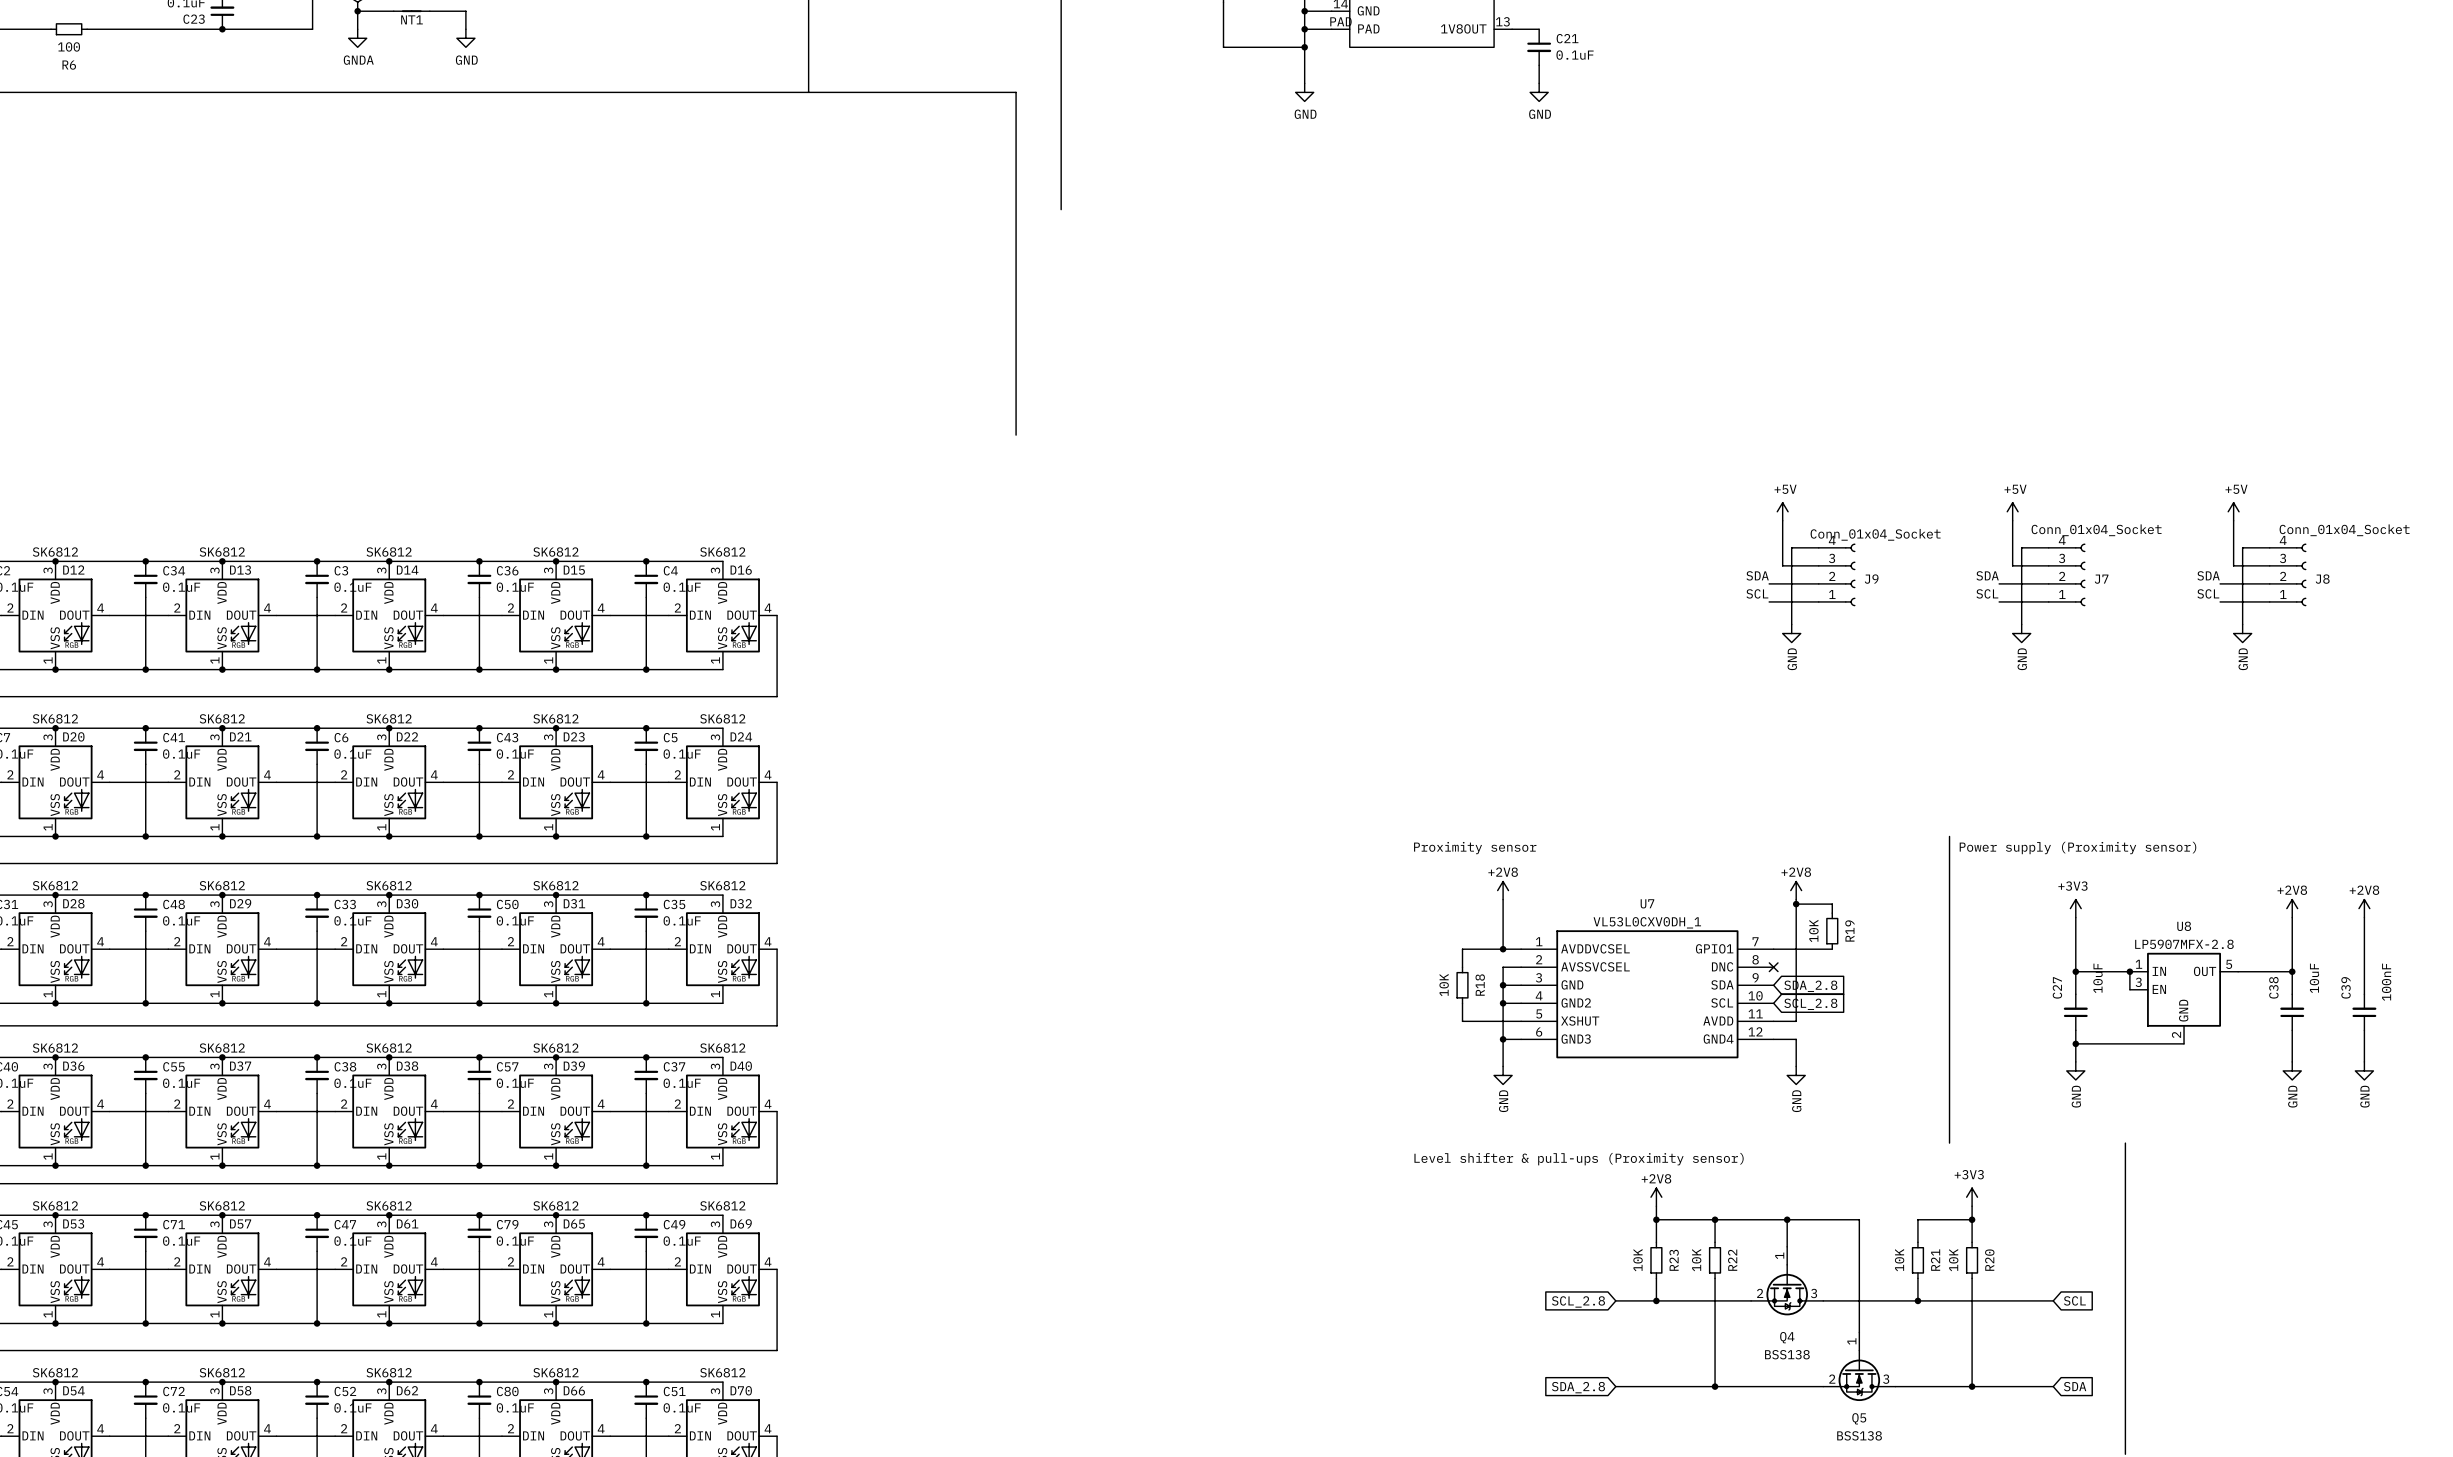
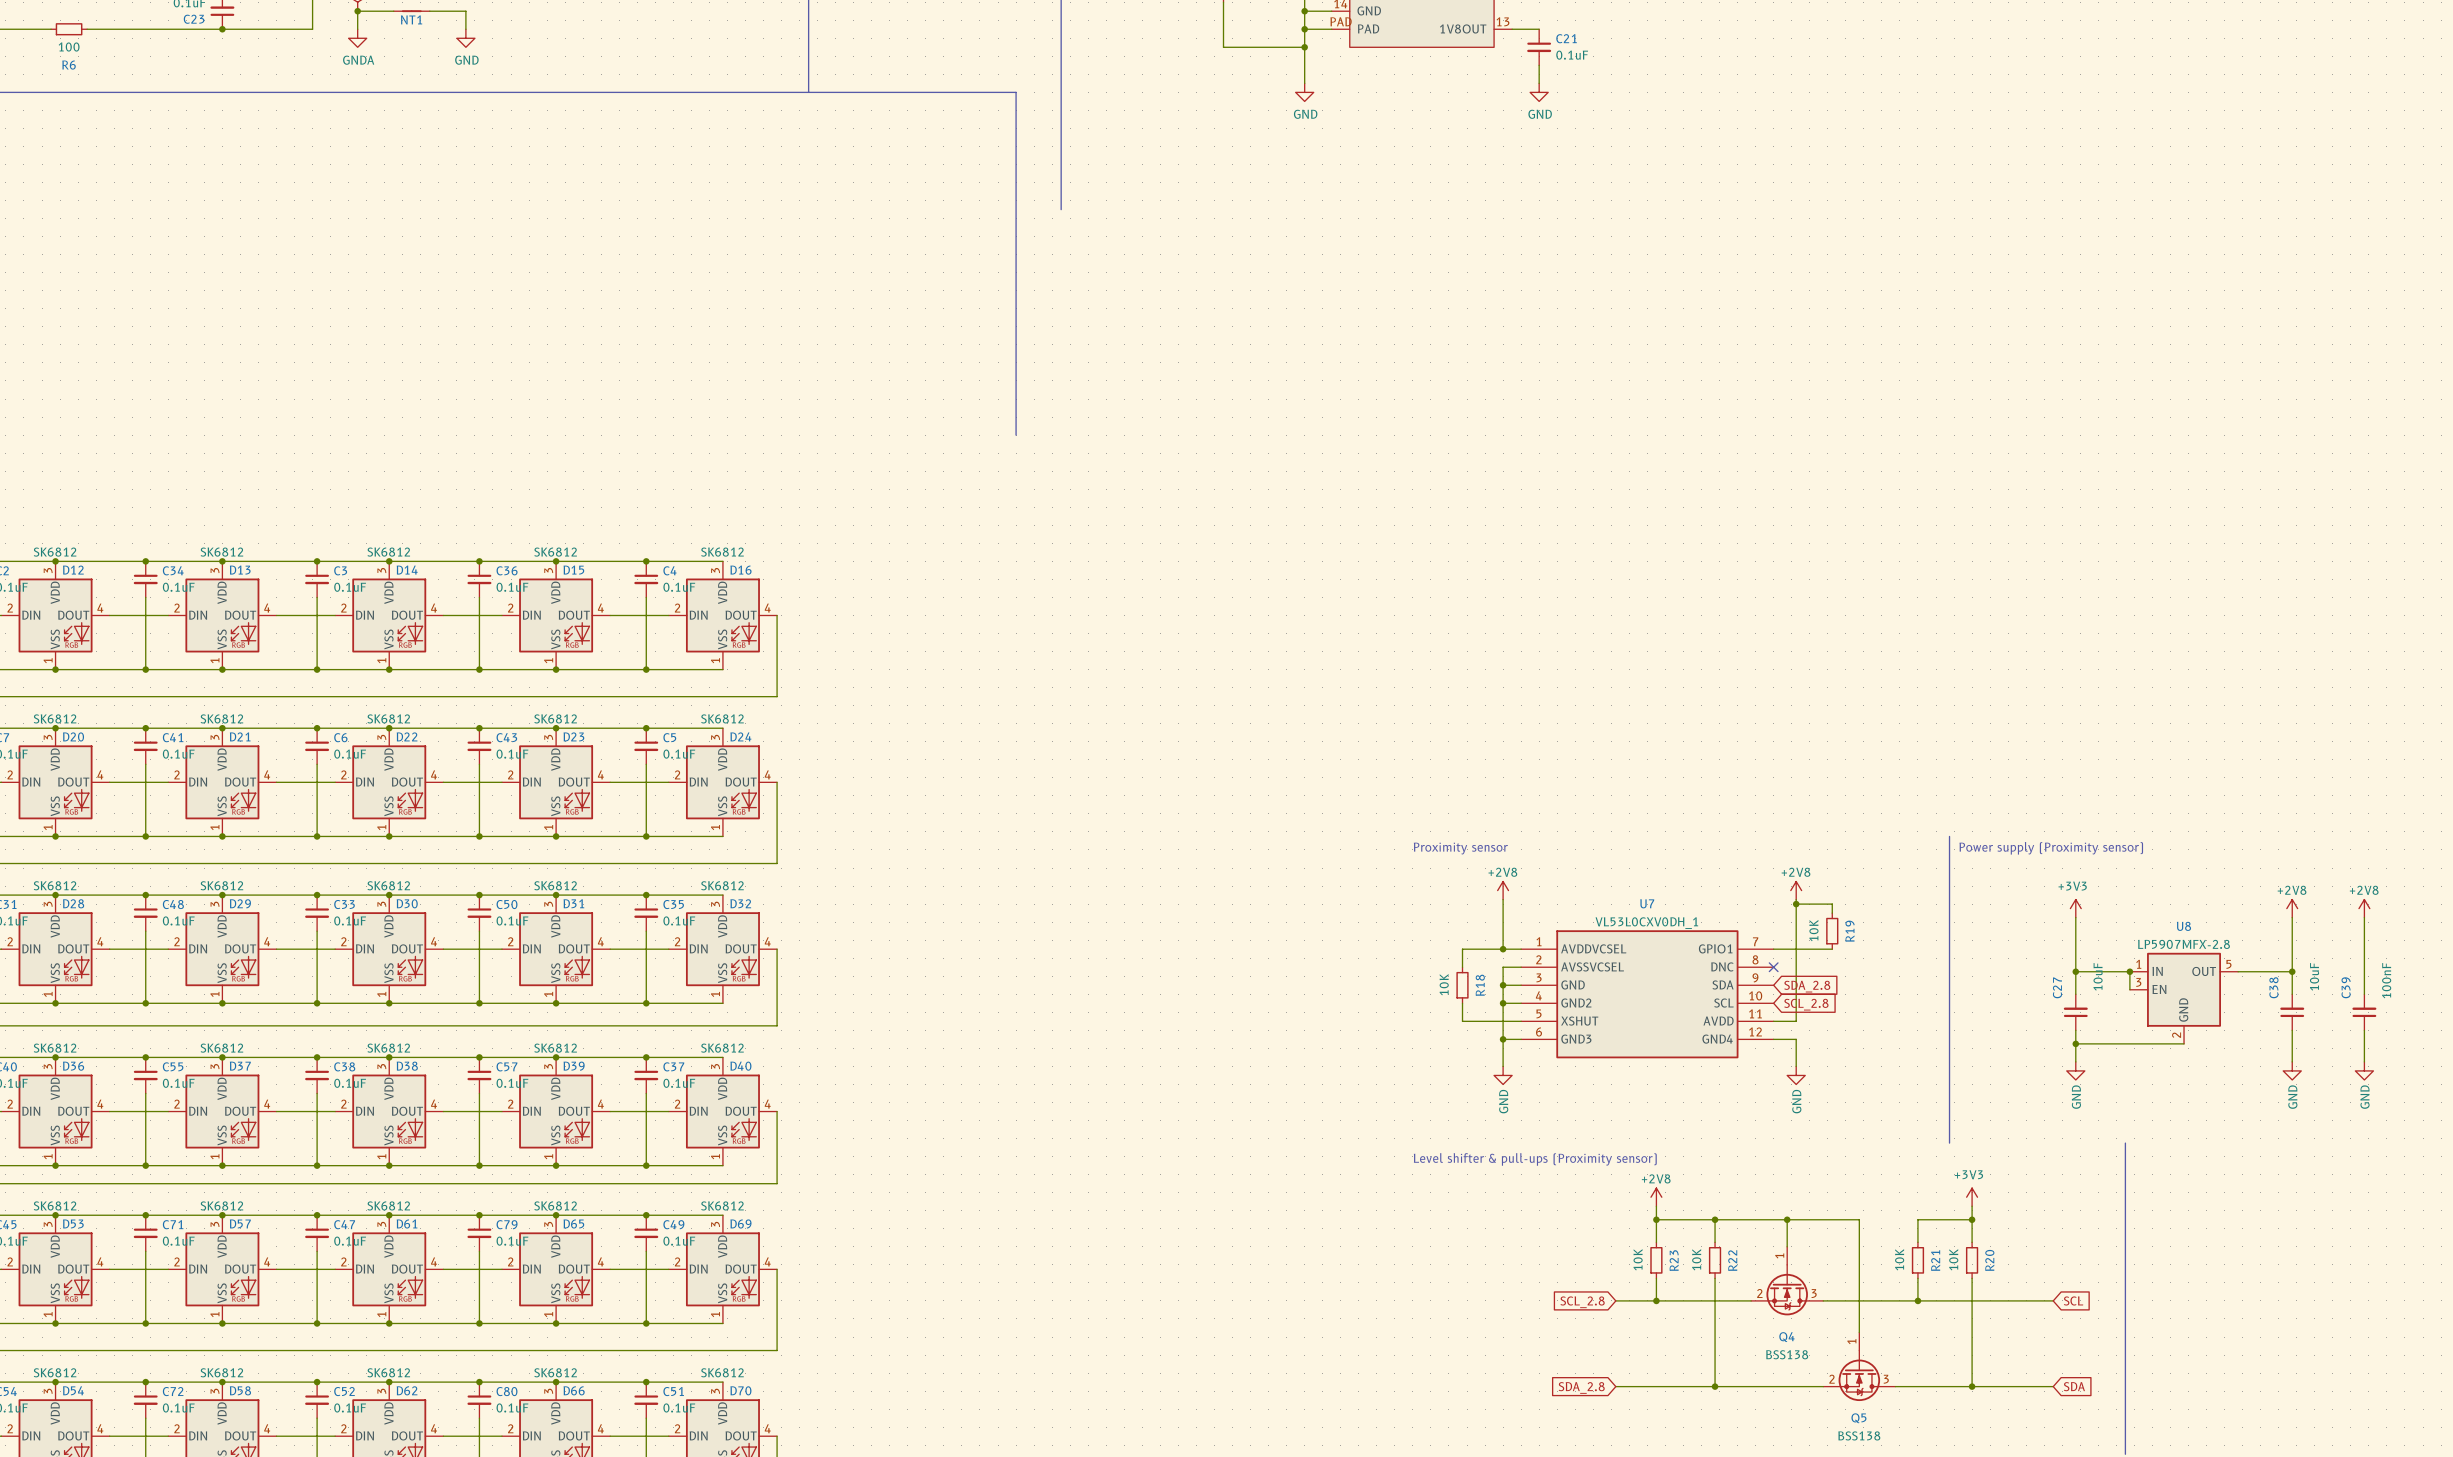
power symbol: +5V (1782, 511) -> none
power symbol: +5V (2012, 511) -> none
power symbol: +5V (2233, 511) -> none
wire: (1782, 520) (1782, 565) (1818, 565) -> none
wire: (2012, 520) (2012, 565) (2048, 565) -> none
wire: (2233, 520) (2233, 565) (2269, 565) -> none
wire: (1818, 547) (1791, 547) (1791, 624) -> none
wire: (2048, 547) (2021, 547) (2021, 624) -> none
wire: (2269, 547) (2242, 547) (2242, 624) -> none
J9: Conn_01x04_Socket (1837, 574) -> none
J7: Conn_01x04_Socket (2067, 574) -> none
J8: Conn_01x04_Socket (2288, 574) -> none
label: SDA (1757, 575) -> none
label: SDA (1987, 575) -> none
label: SDA (2208, 575) -> none
wire: (1769, 583) (1818, 583) -> none
wire: (1999, 583) (2048, 583) -> none
wire: (2220, 583) (2269, 583) -> none
label: SCL (1757, 593) -> none
label: SCL (1987, 593) -> none
label: SCL (2208, 593) -> none
wire: (1769, 601) (1818, 601) -> none
wire: (1999, 601) (2048, 601) -> none
wire: (2220, 601) (2269, 601) -> none
power symbol: GND (1791, 633) -> none
power symbol: GND (2021, 633) -> none
power symbol: GND (2242, 633) -> none

